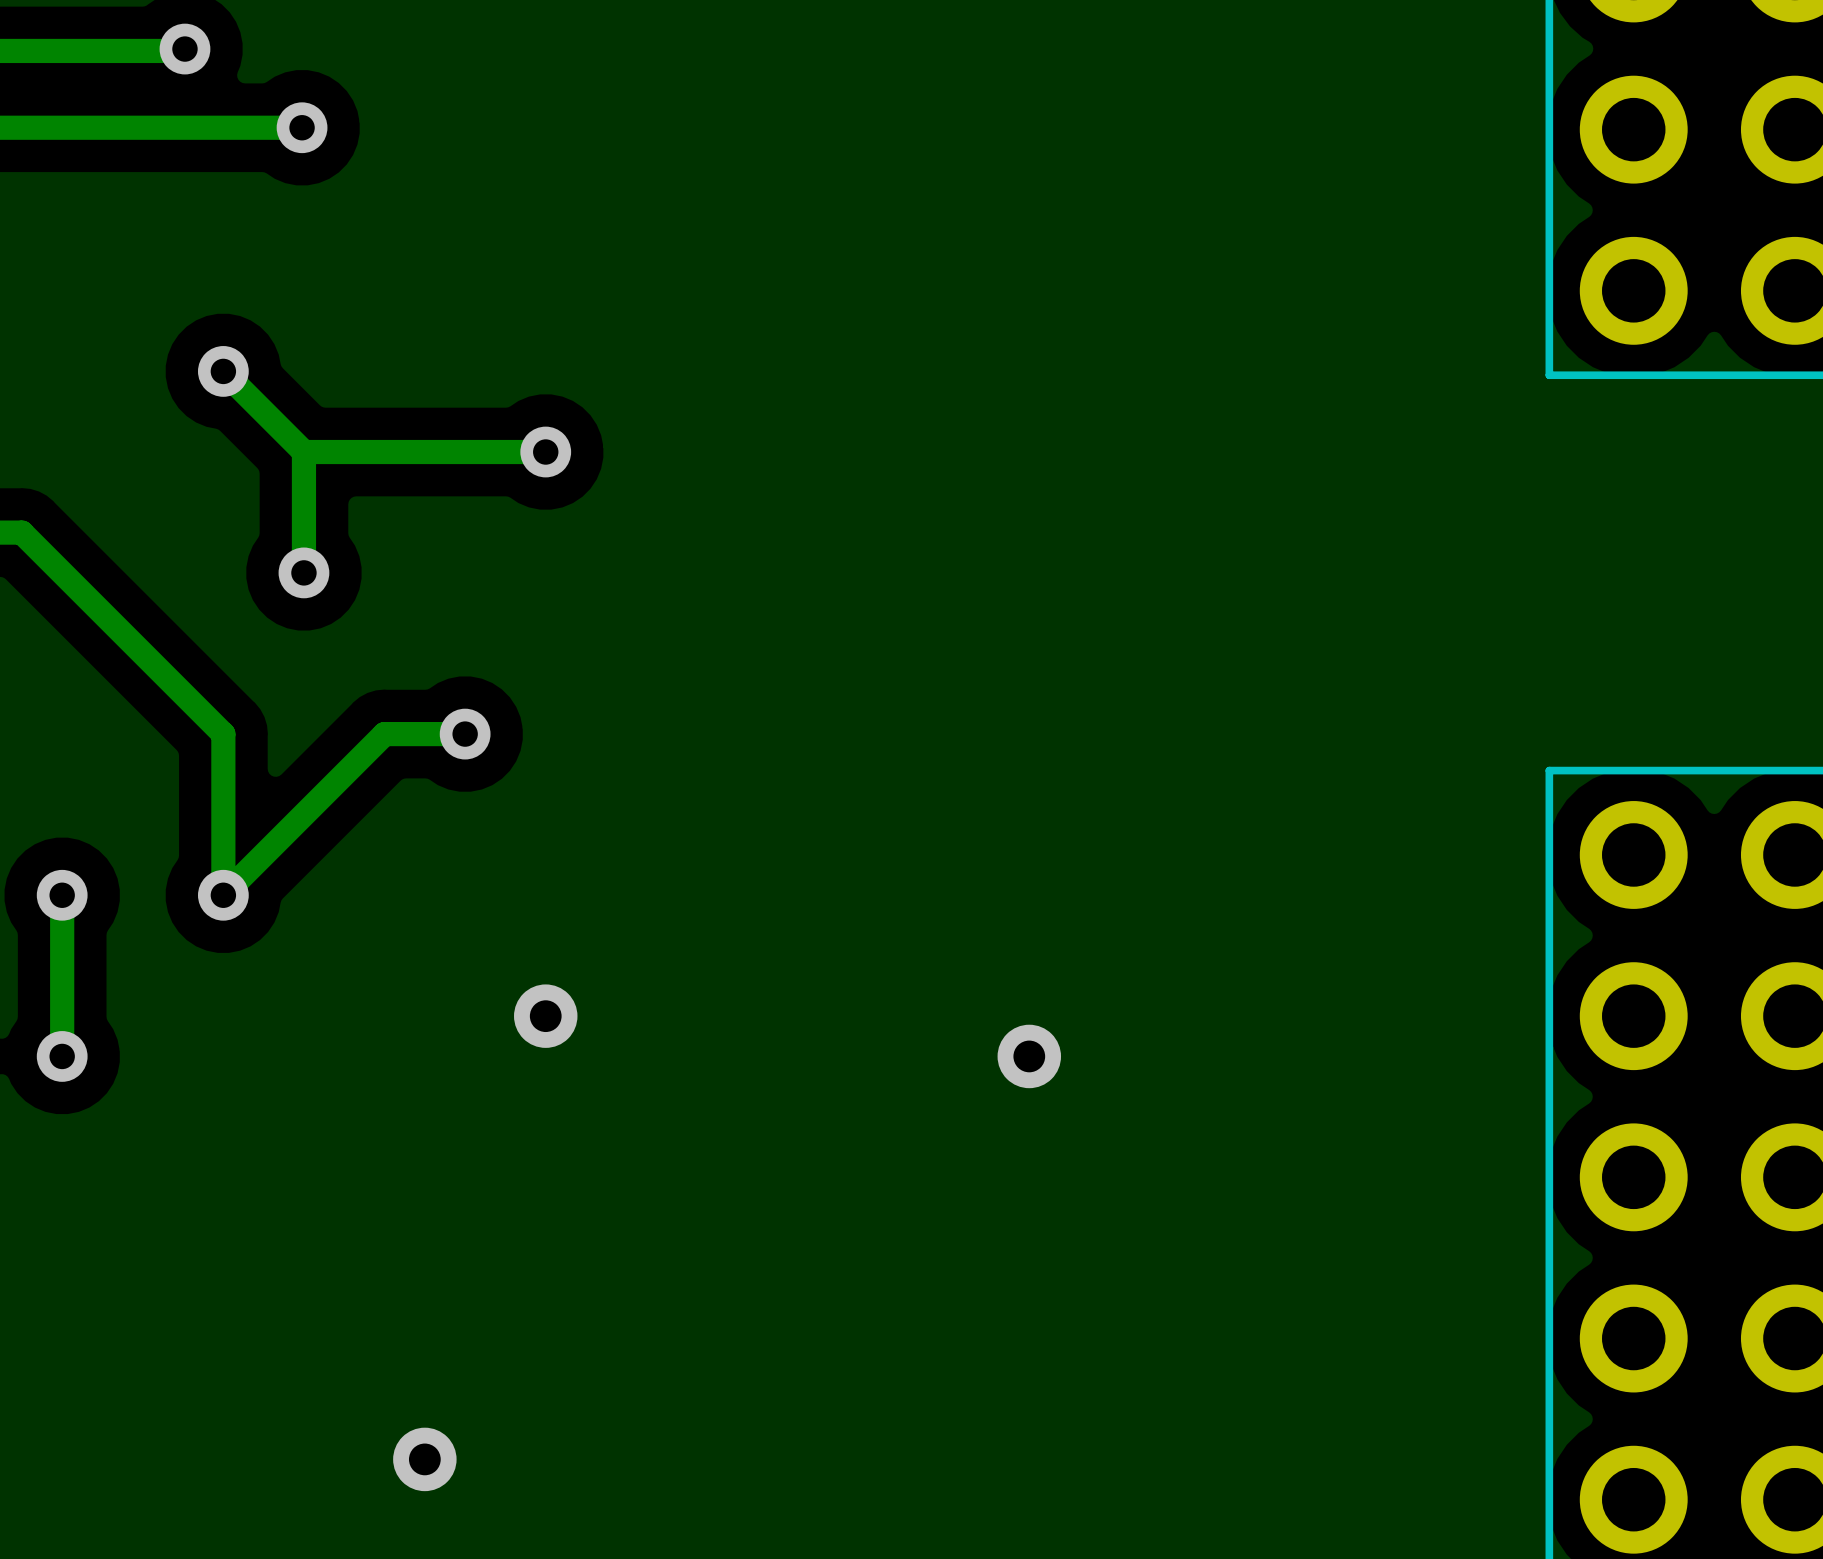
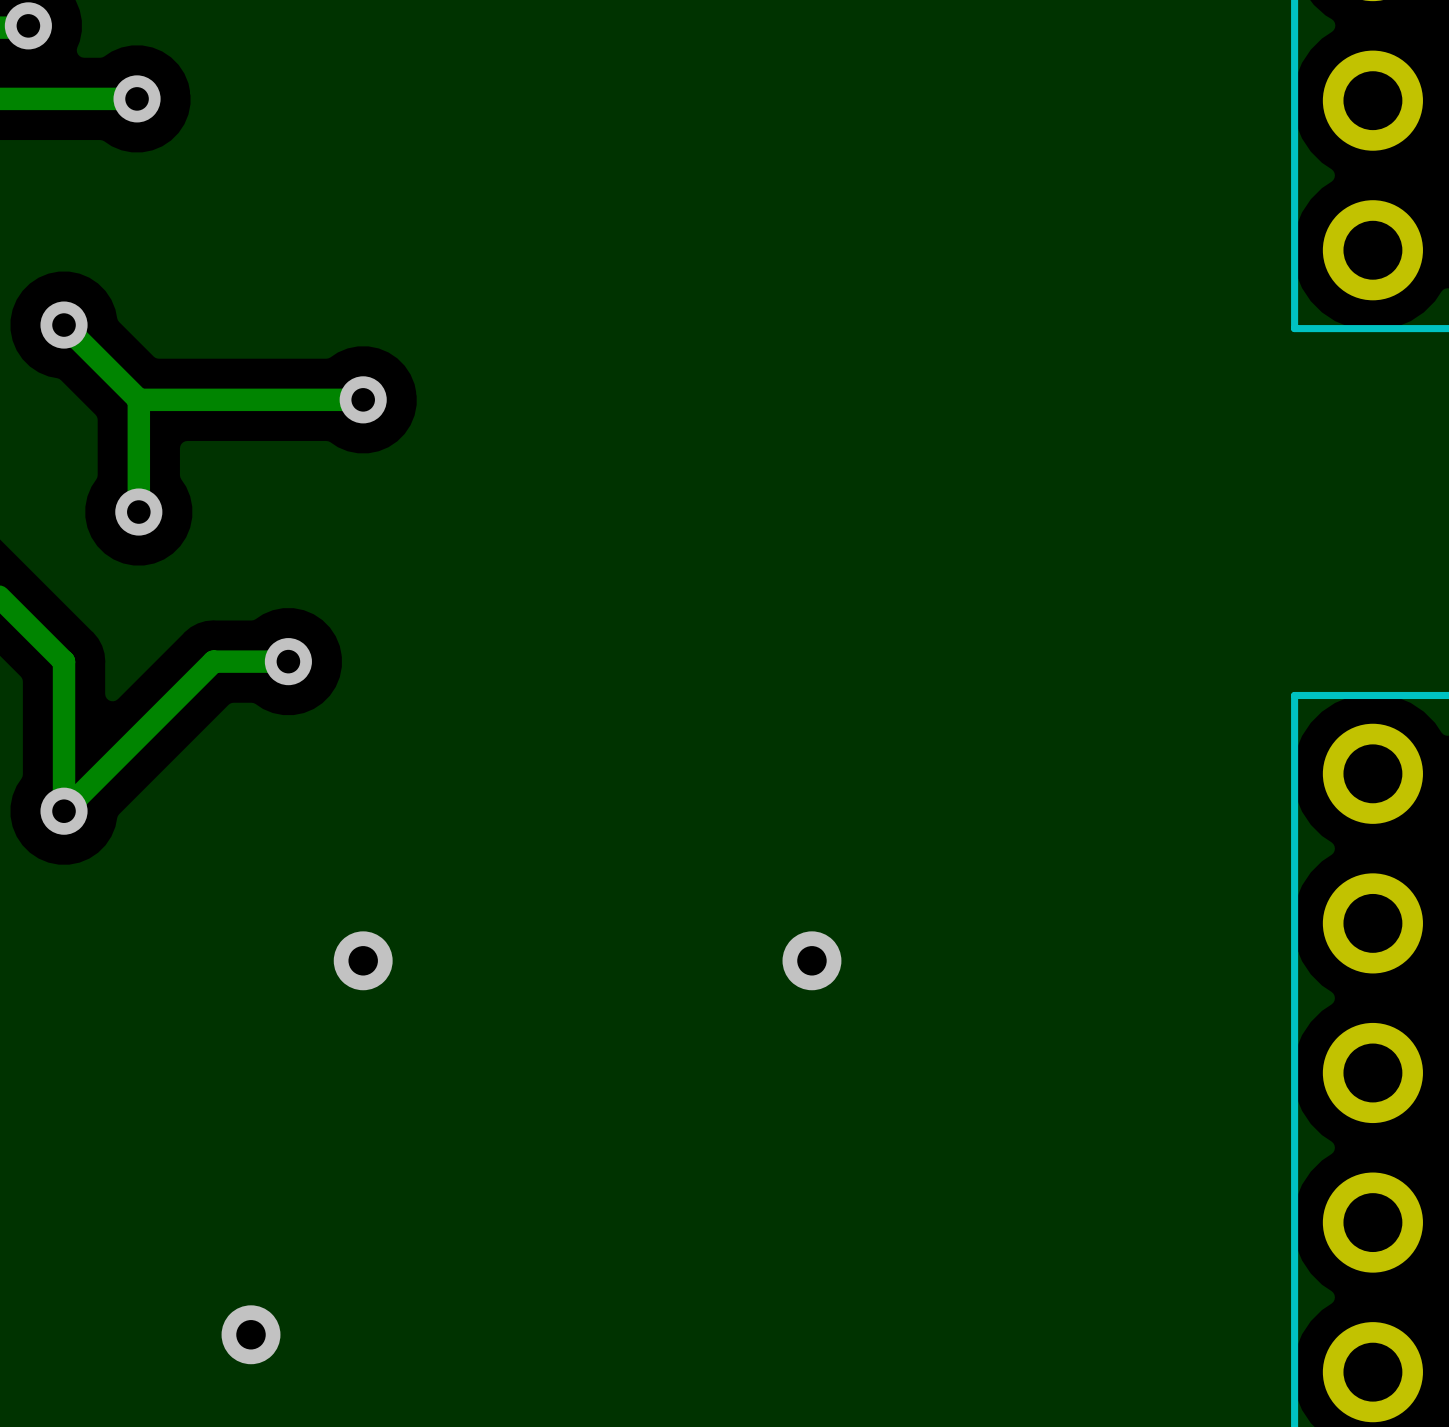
via position: (545, 1016) -> (363, 960)

